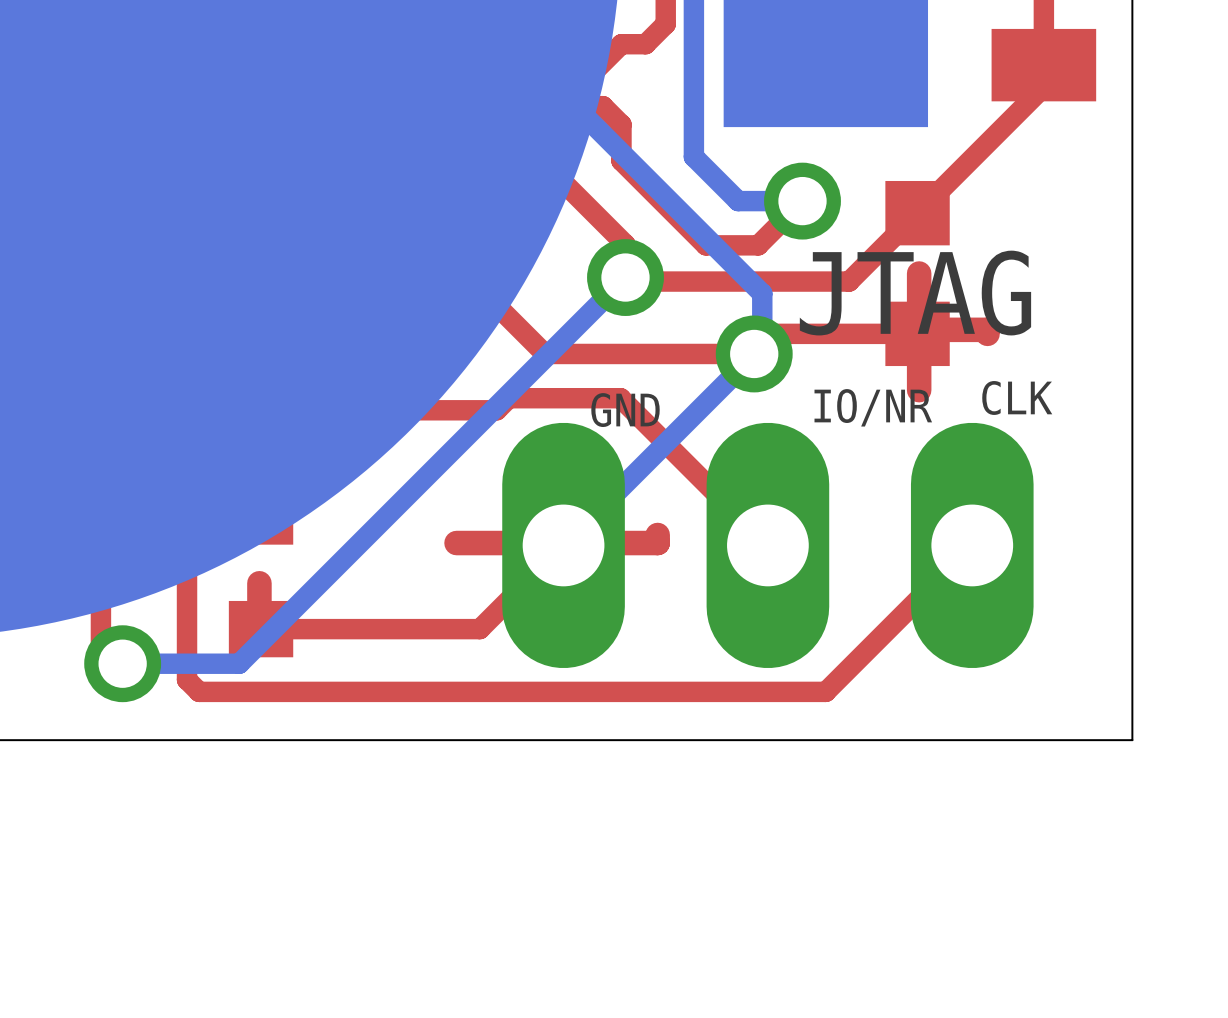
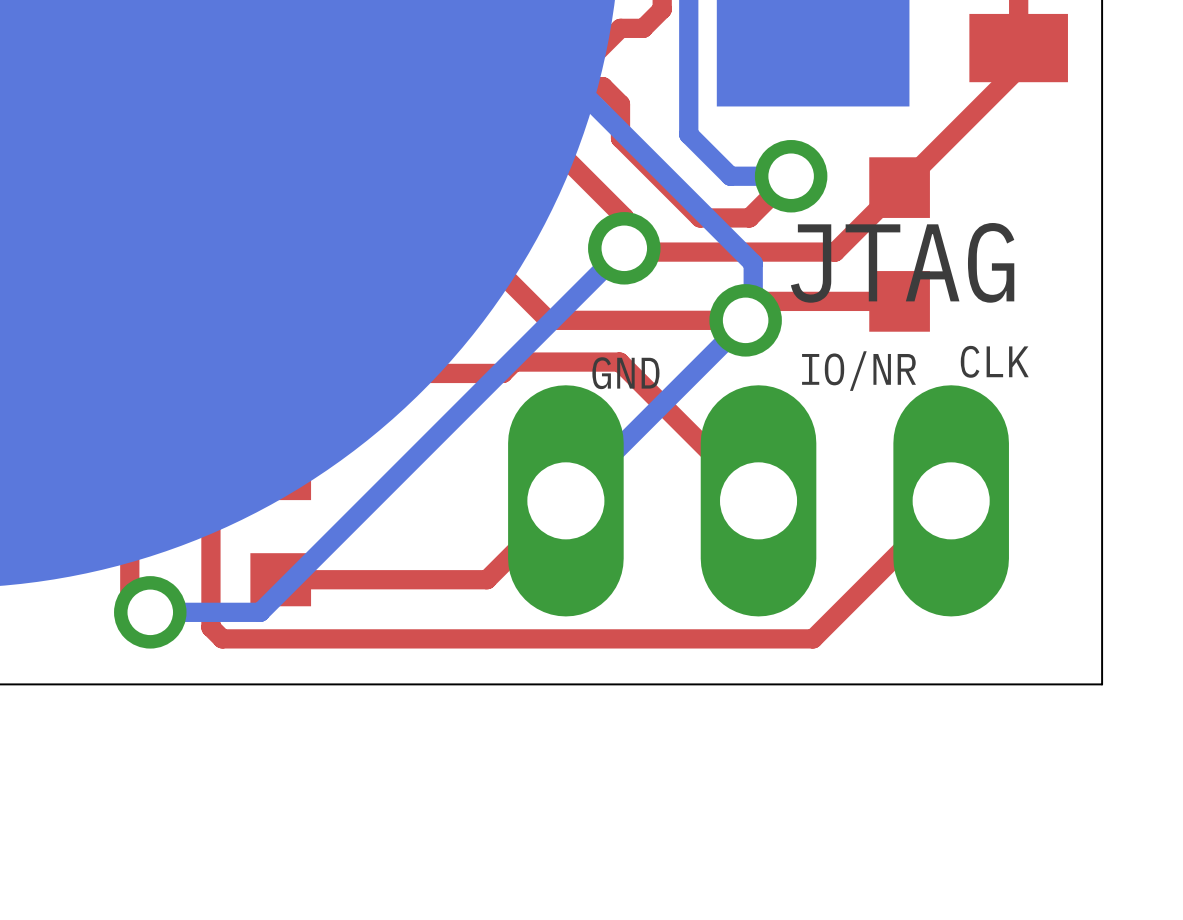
top track: (919, 273) (919, 390) -> none
top track: (919, 329) (987, 329) (987, 333) -> none
top track: (657, 534) (657, 543) (456, 543) -> none
top track: (259, 583) (259, 611) -> none

